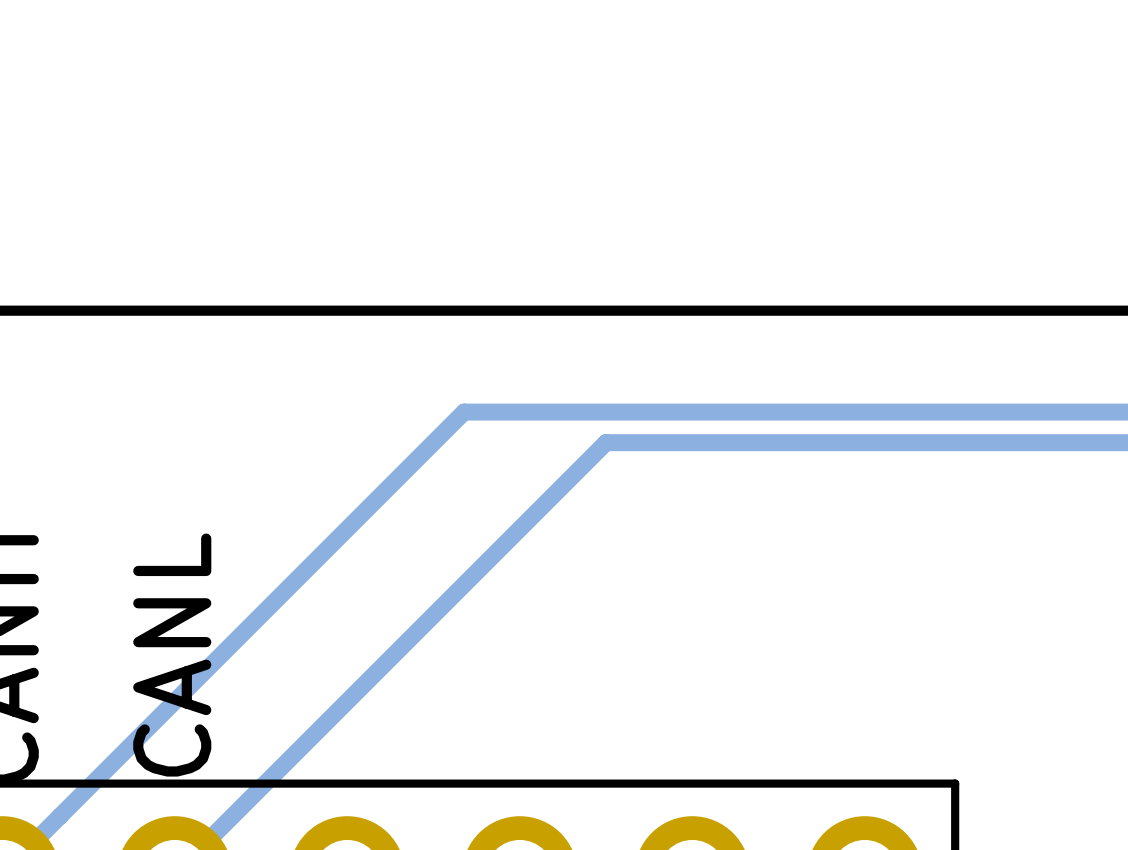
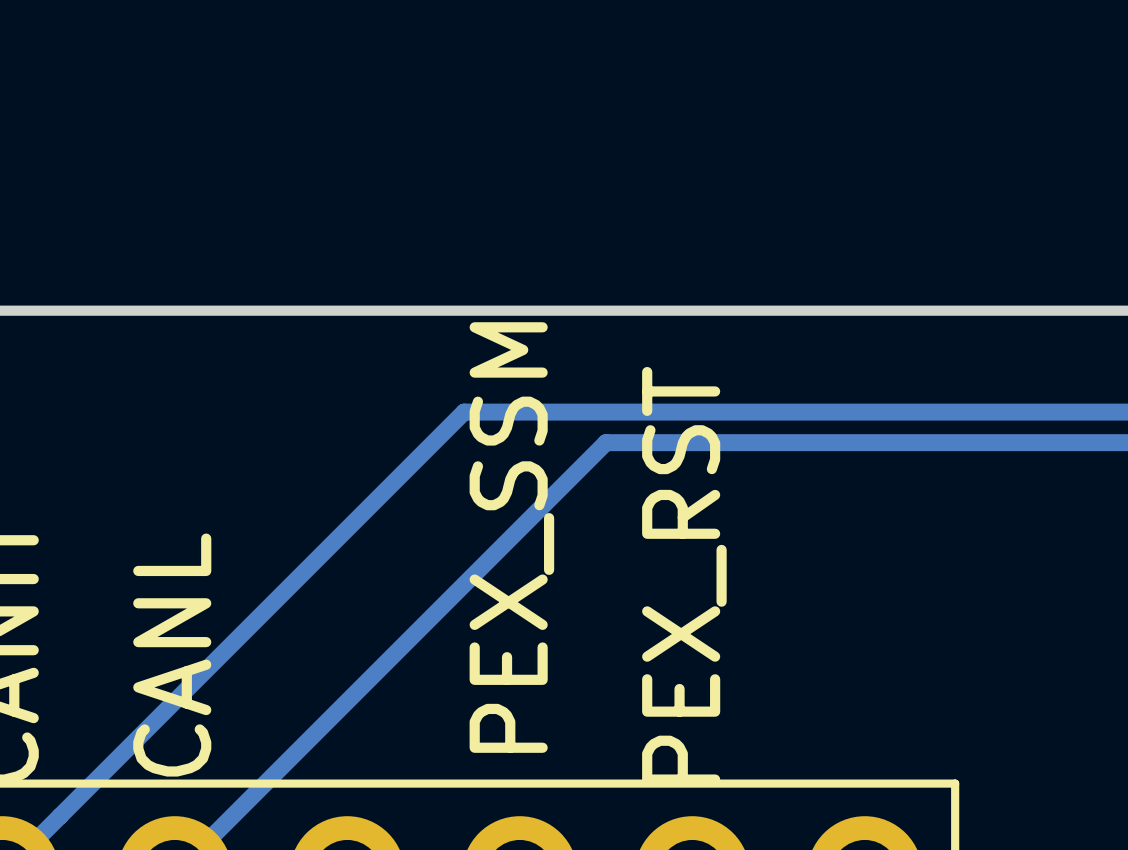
text: none -> PEX_SSM (511, 537)
text: none -> PEX_RST (684, 575)

